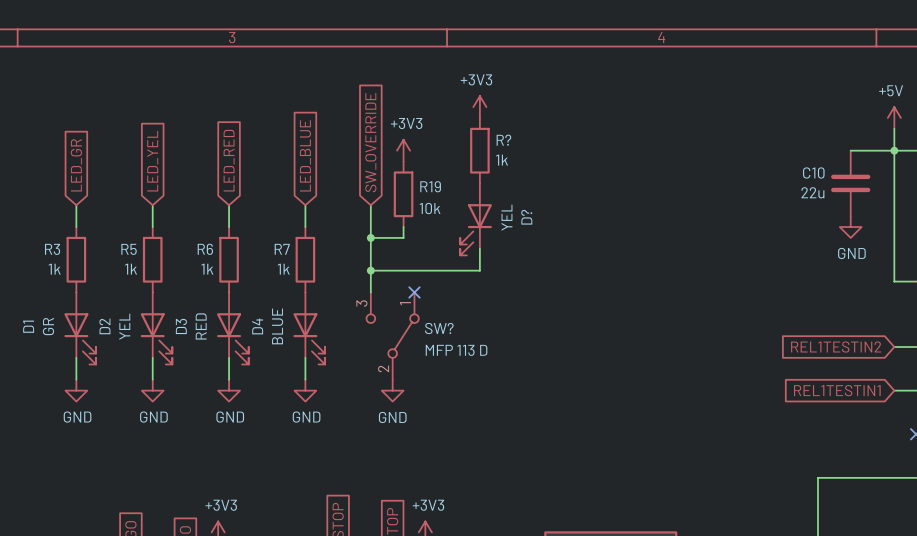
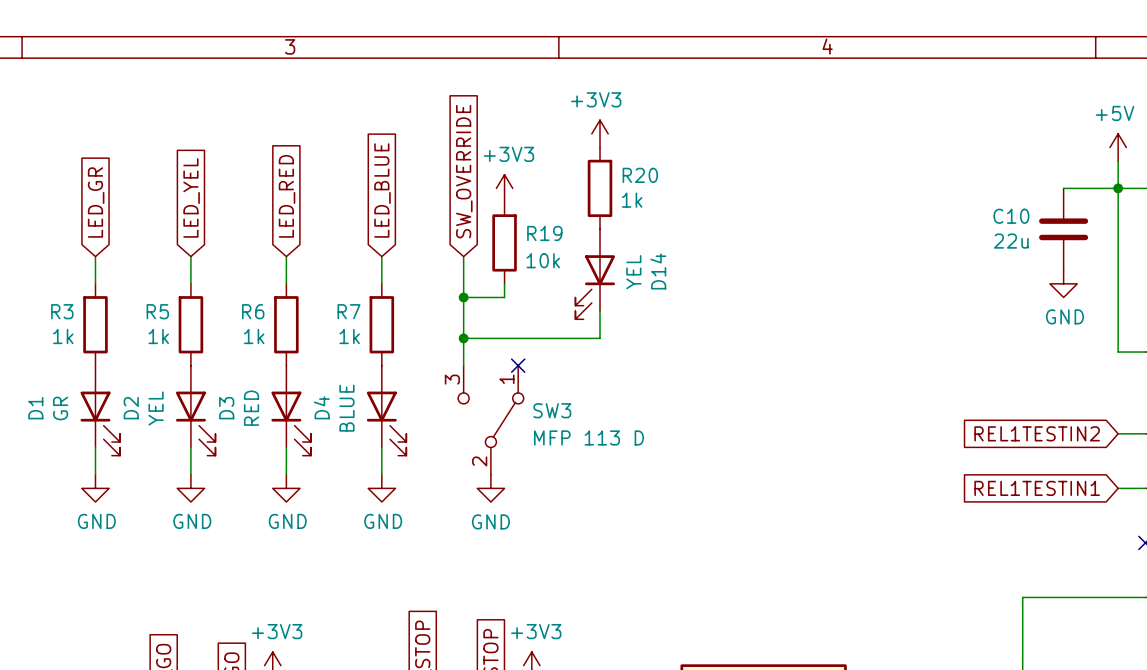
R? name: R? (503, 140) -> R20 (640, 175)
D? name: D? (526, 217) -> D14 (658, 271)
SW? name: SW? (439, 328) -> SW3 (552, 410)

